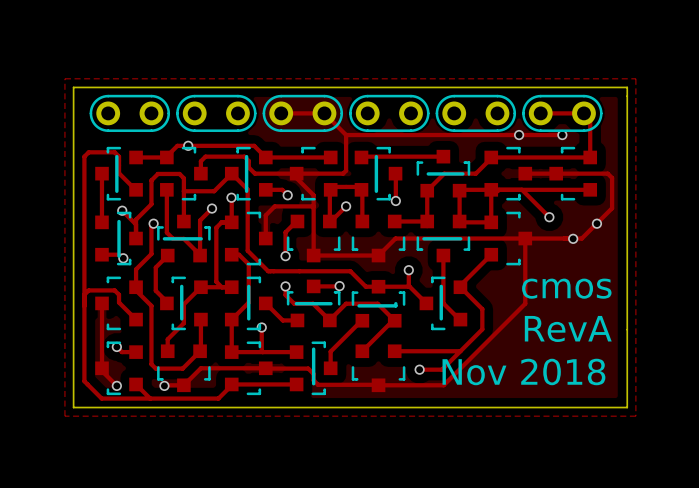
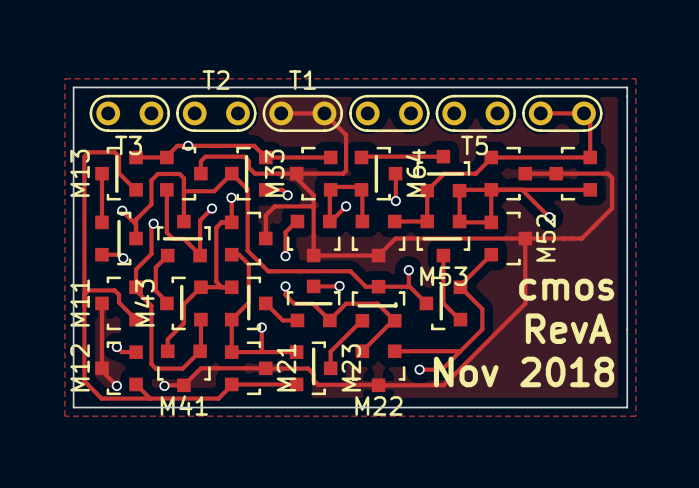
T2 name: none -> T2 (216, 80)
T1 name: none -> T1 (302, 80)
track: (346, 135) (562, 135) -> none
via: (519, 135) -> none
via: (562, 135) -> none
T3 name: none -> T3 (128, 145)
T5 name: none -> T5 (474, 145)
M13 name: none -> M13 (80, 173)
M33 name: none -> M33 (274, 173)
M64 name: none -> M64 (415, 172)
via: (596, 223) -> none
M52 name: none -> M52 (545, 238)
via: (573, 238) -> none
M53 name: none -> M53 (443, 276)
M11 name: none -> M11 (80, 303)
M43 name: none -> M43 (144, 303)
M12 name: none -> M12 (80, 367)
M21 name: none -> M21 (286, 367)
M23 name: none -> M23 (351, 367)
M41 name: none -> M41 (184, 405)
M22 name: none -> M22 (378, 405)

